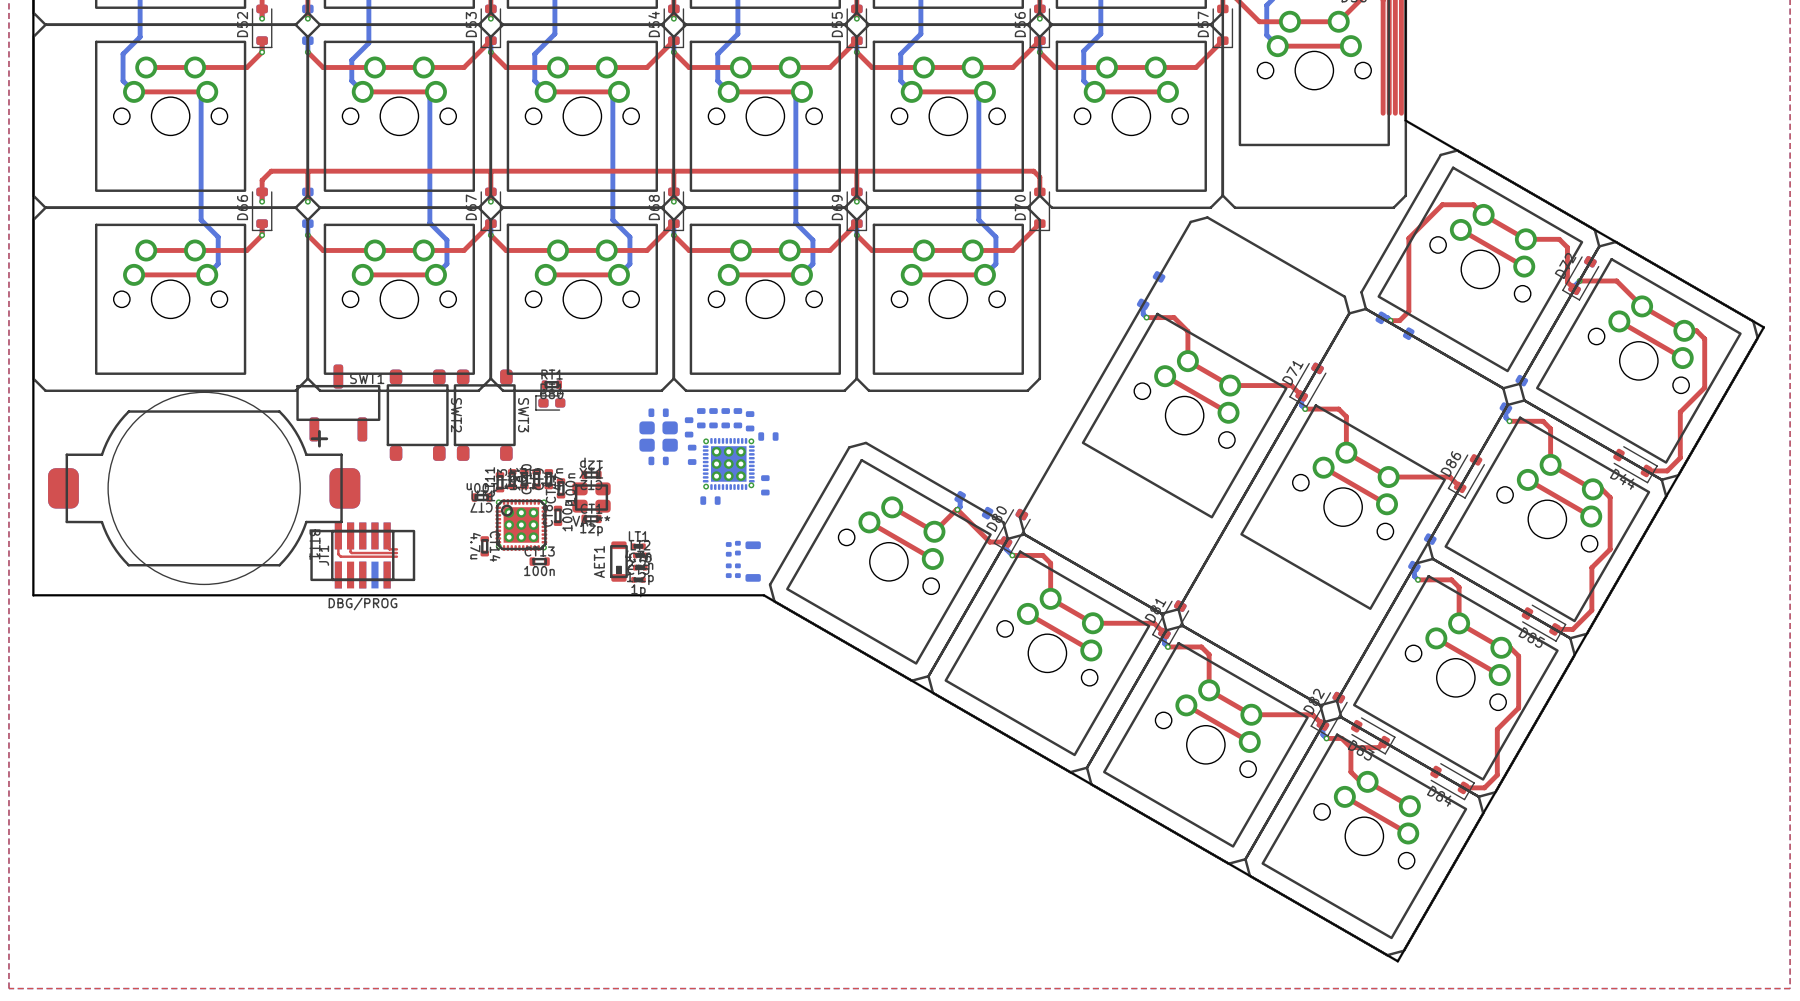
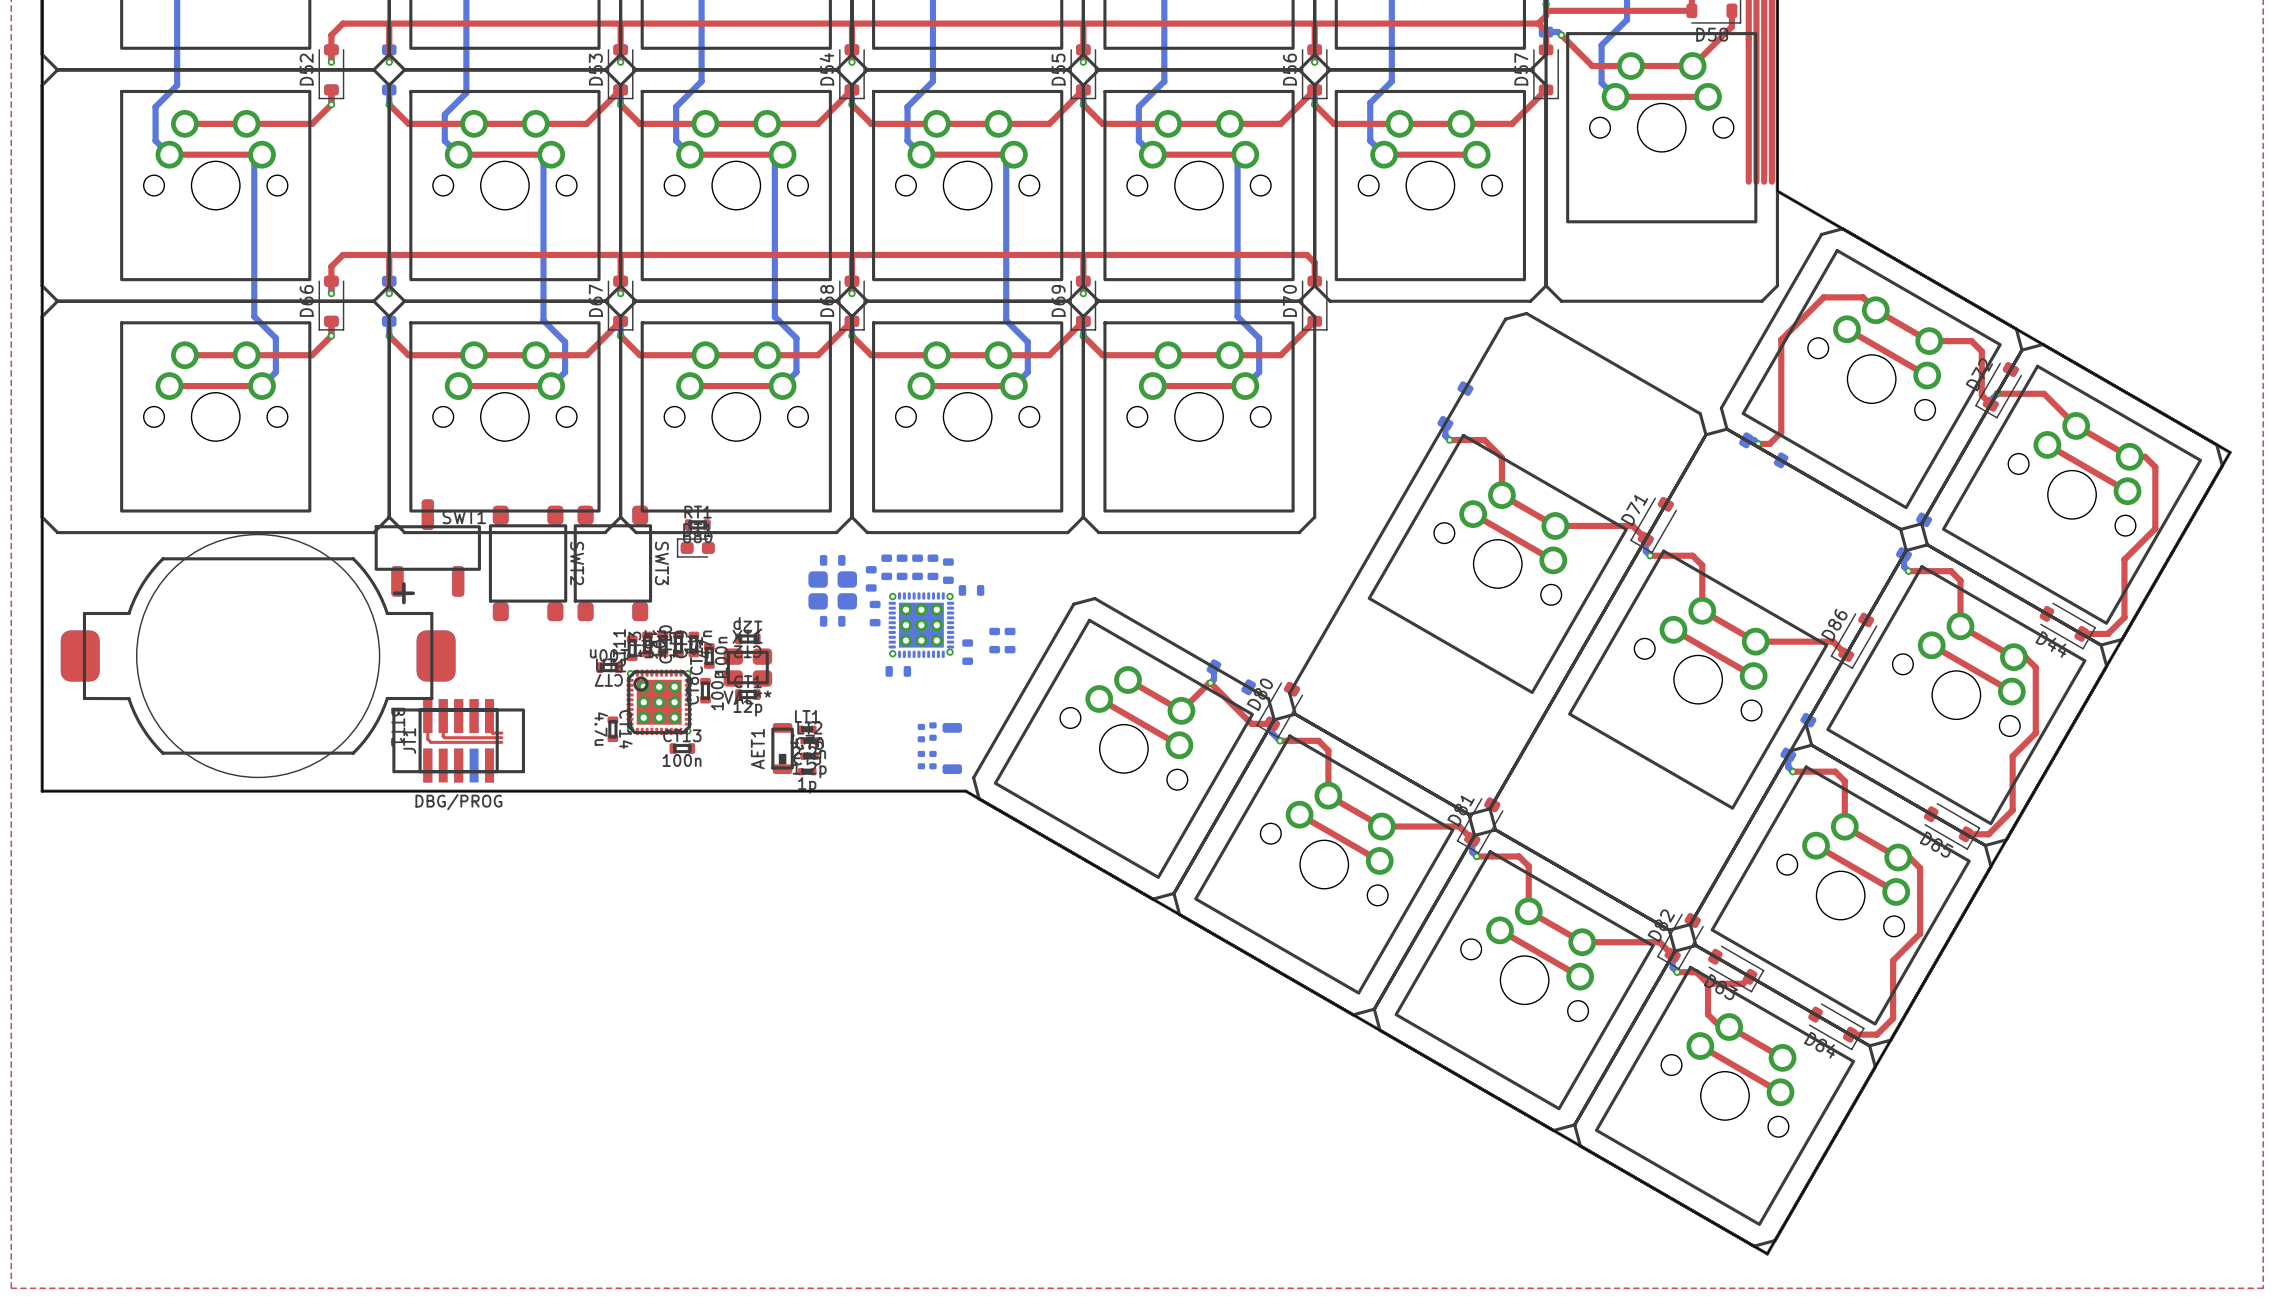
part: none -> (994, 640)
part: none -> (1010, 640)

